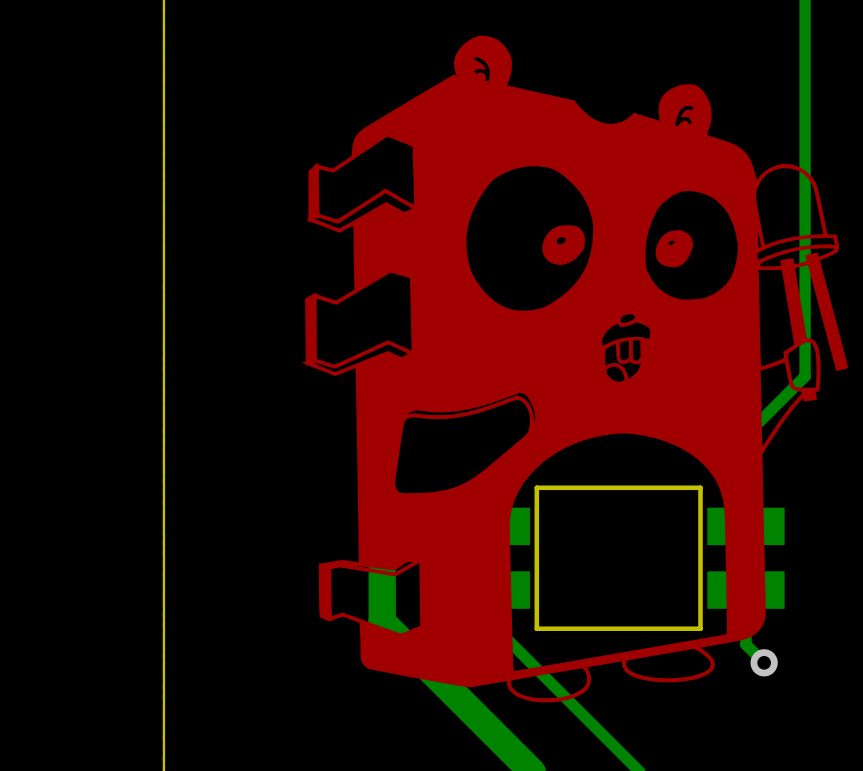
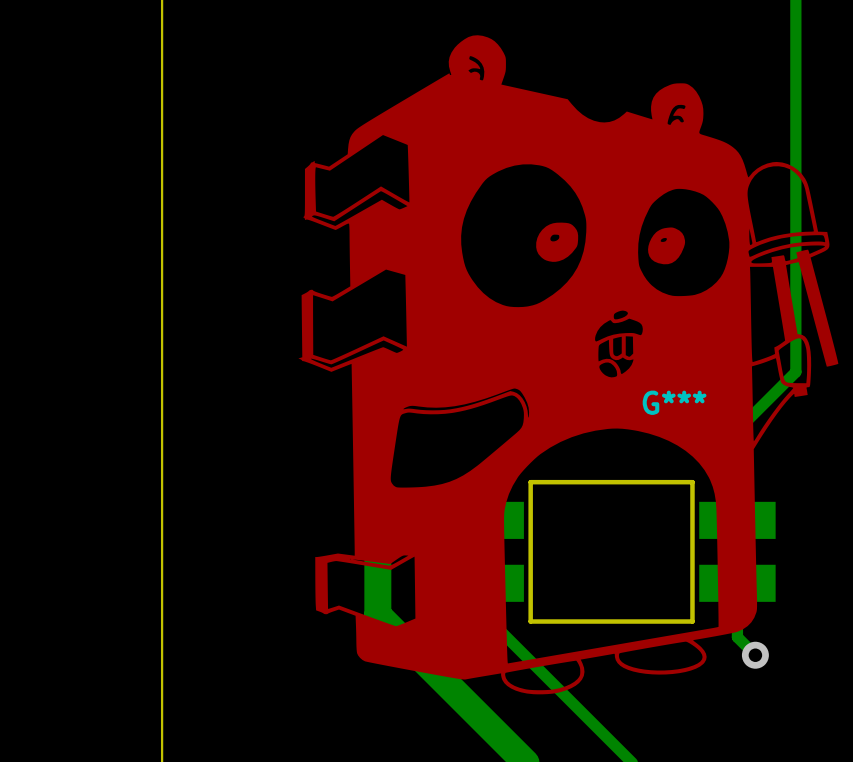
drawing: [301, 35, 849, 703] -> none
G***: none -> (568, 364)

